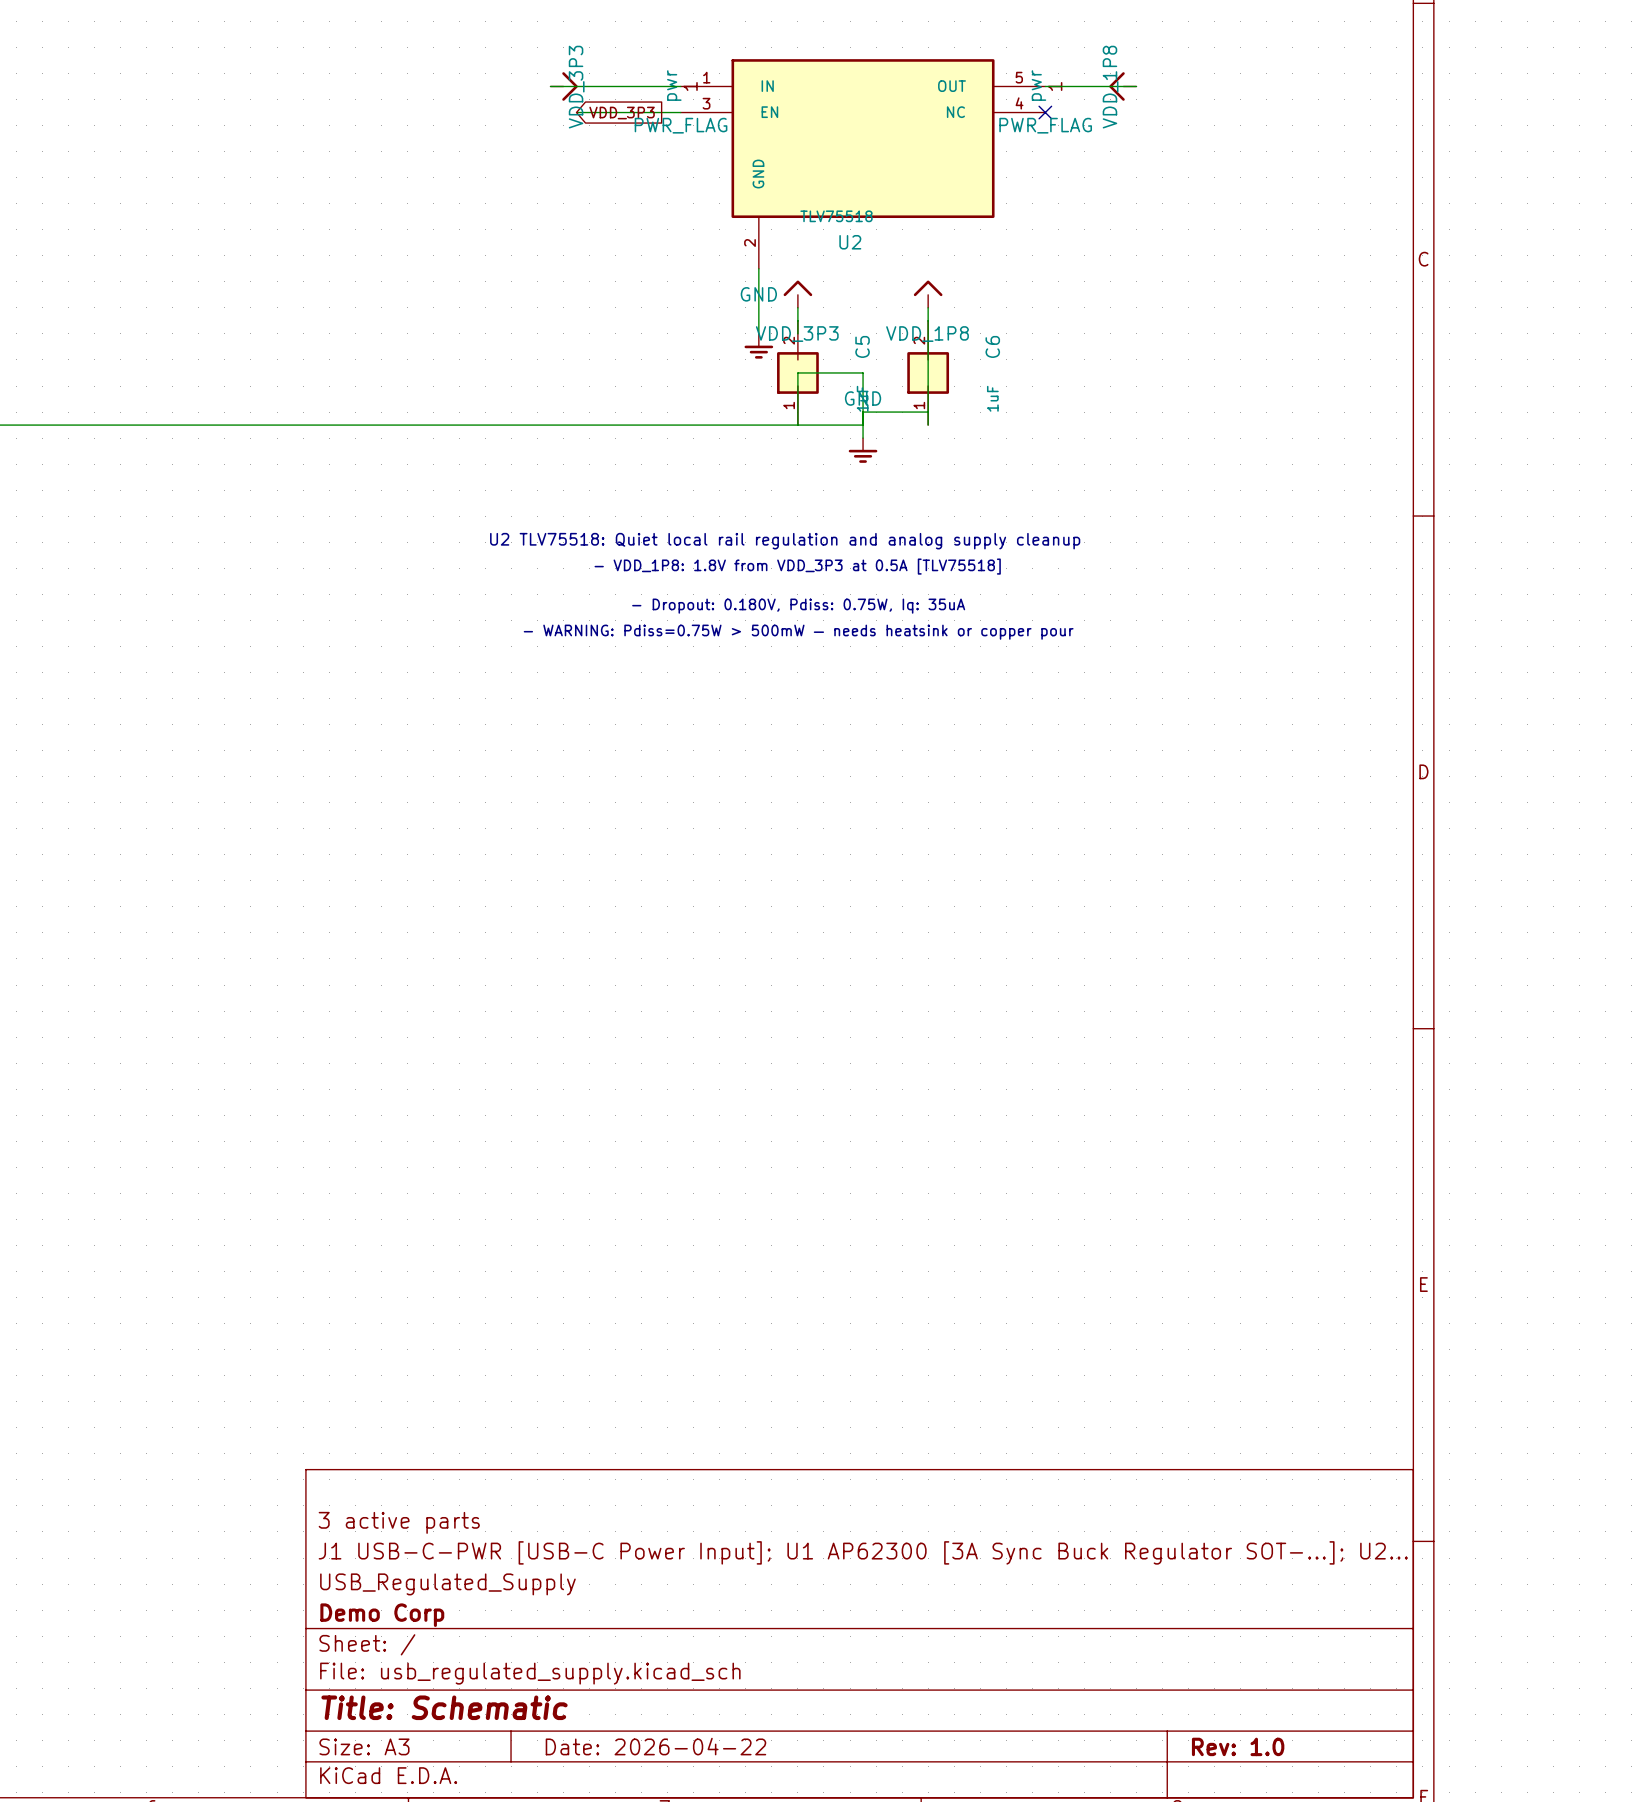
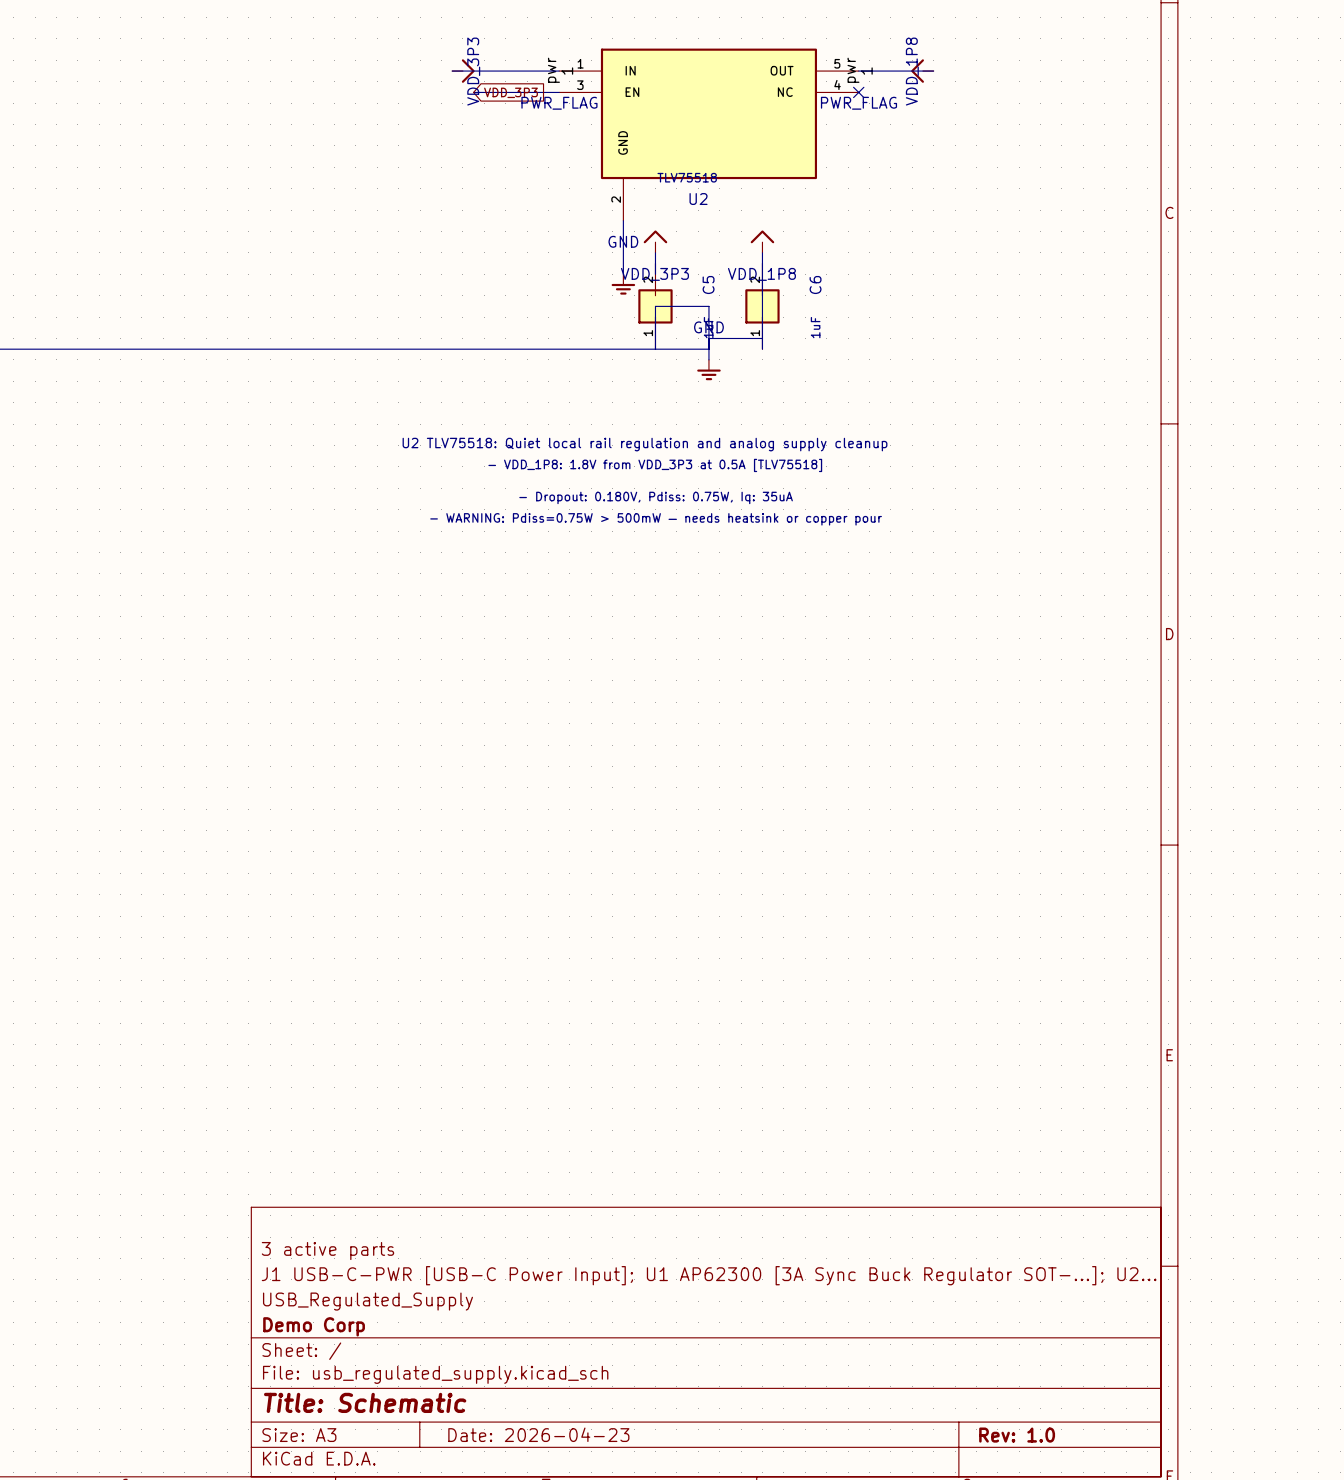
title block: Date: 2026-04-22 (655, 1746) -> Date: 2026-04-23 (538, 1434)

